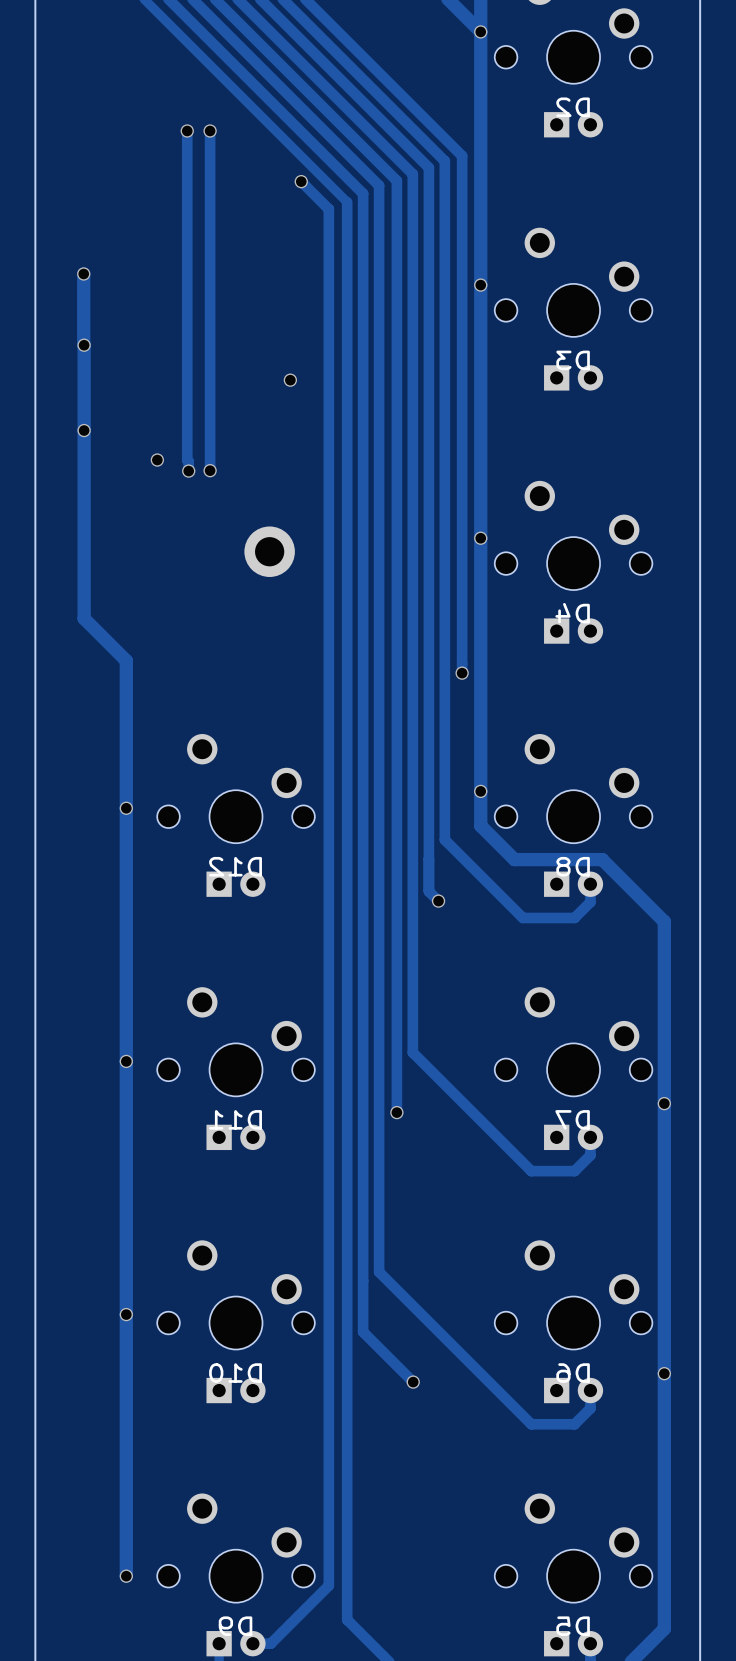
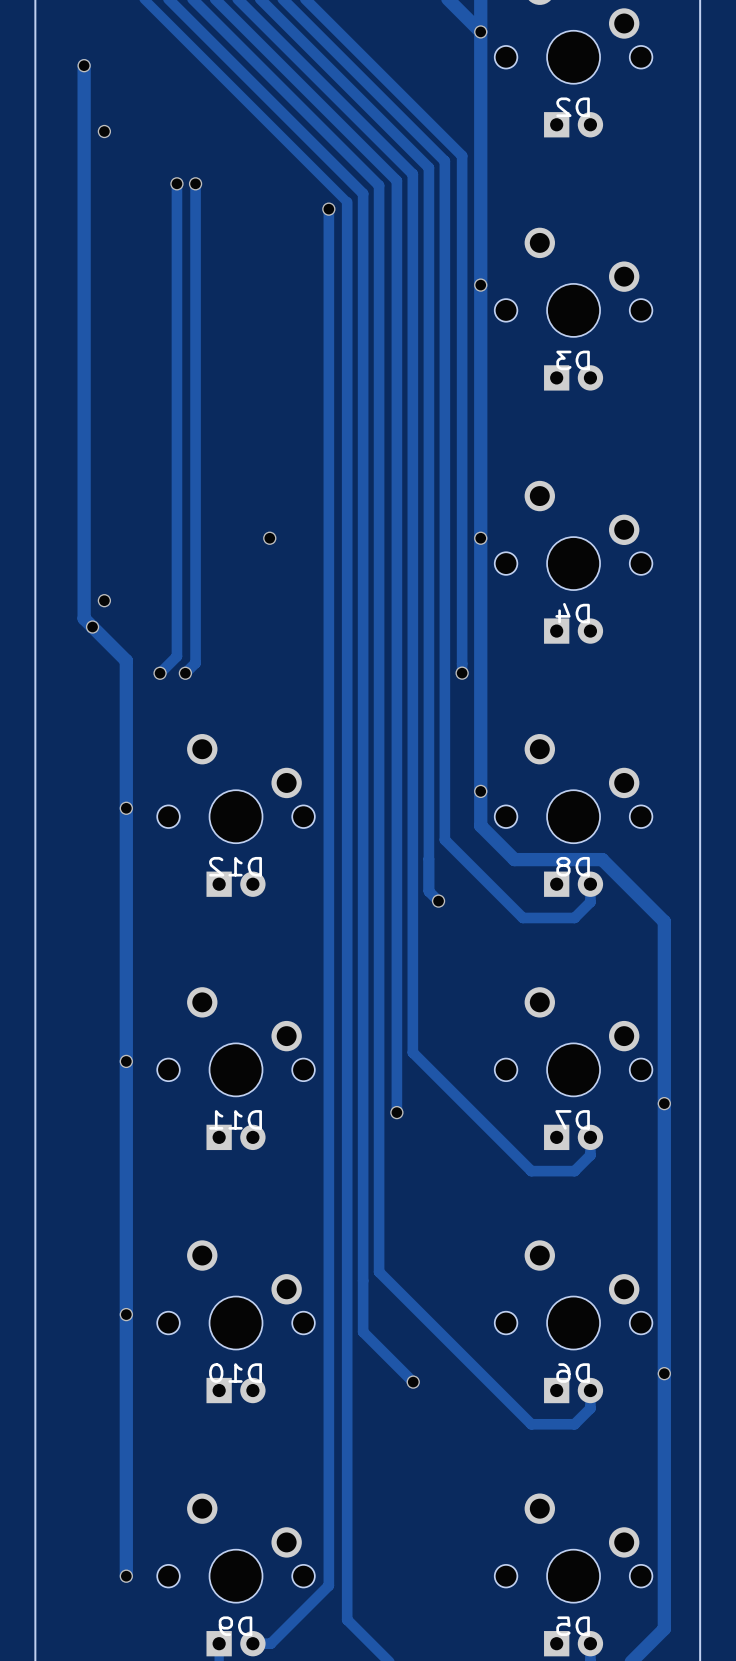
via: none -> (84, 65)
via: none -> (104, 131)
track: (187, 131) (188, 471) -> none
via: (187, 131) -> none
track: (210, 131) (210, 470) -> none
via: (210, 131) -> none
track: (301, 181) (328, 209) -> none
via position: (301, 181) -> (328, 209)
track: none -> (176, 183) (176, 656) (160, 673)
via: none -> (176, 183)
track: none -> (195, 183) (195, 663) (185, 673)
via: none -> (195, 183)
track: (83, 273) (84, 345) -> (84, 65) (84, 345)
via: (83, 273) -> none
via: (84, 345) -> none
via: (290, 380) -> none
via: (84, 430) -> none
via: (157, 460) -> none
via: (210, 470) -> none
via: (188, 471) -> none
via: none -> (269, 538)
part: (269, 551) -> none
via: none -> (104, 600)
via: none -> (92, 627)
via: none -> (160, 673)
via: none -> (185, 673)

